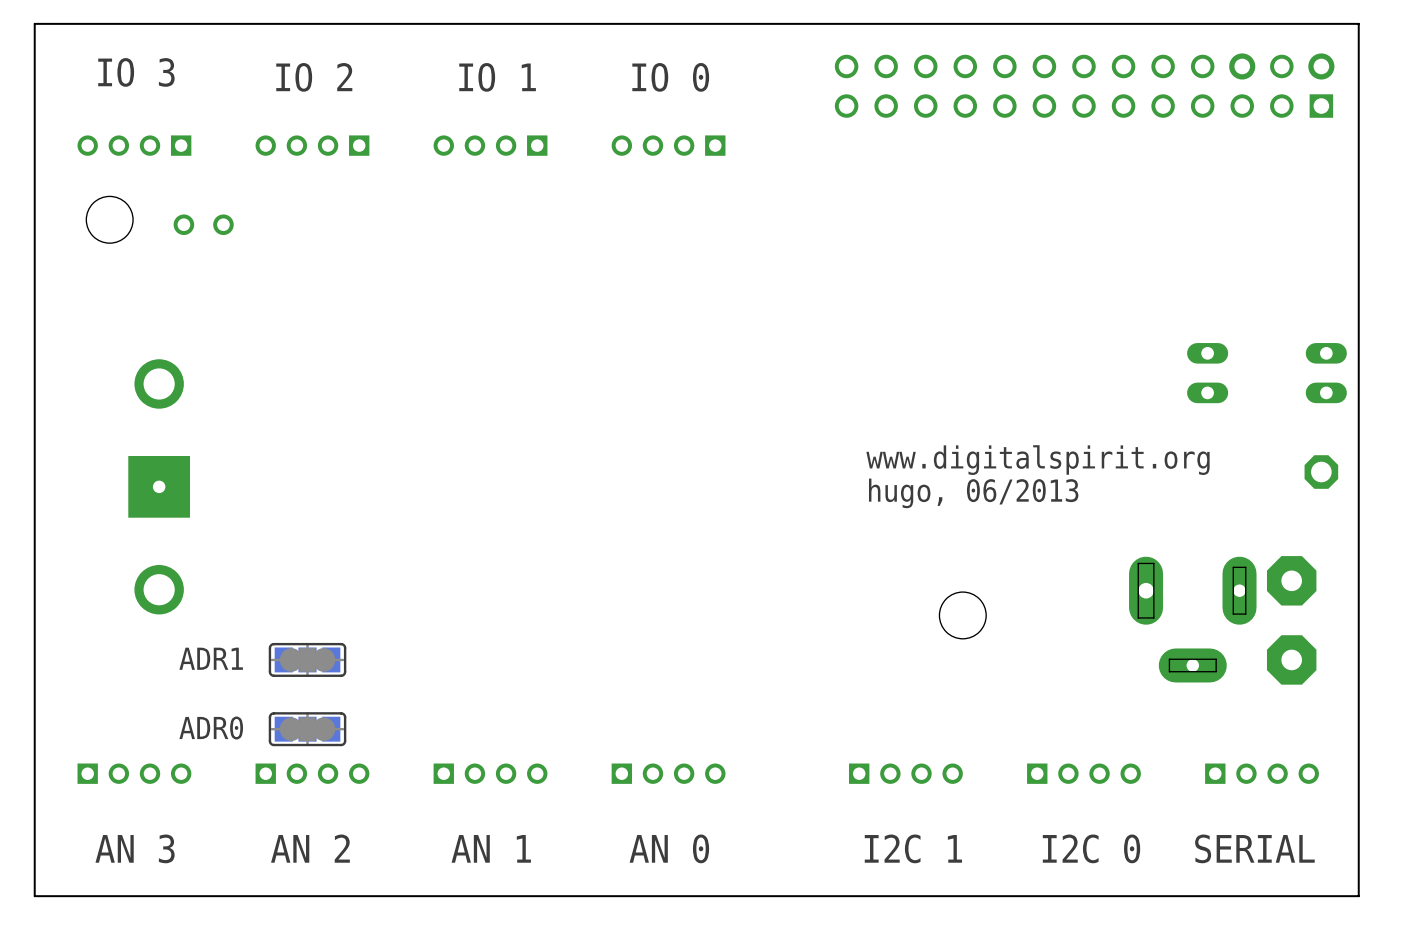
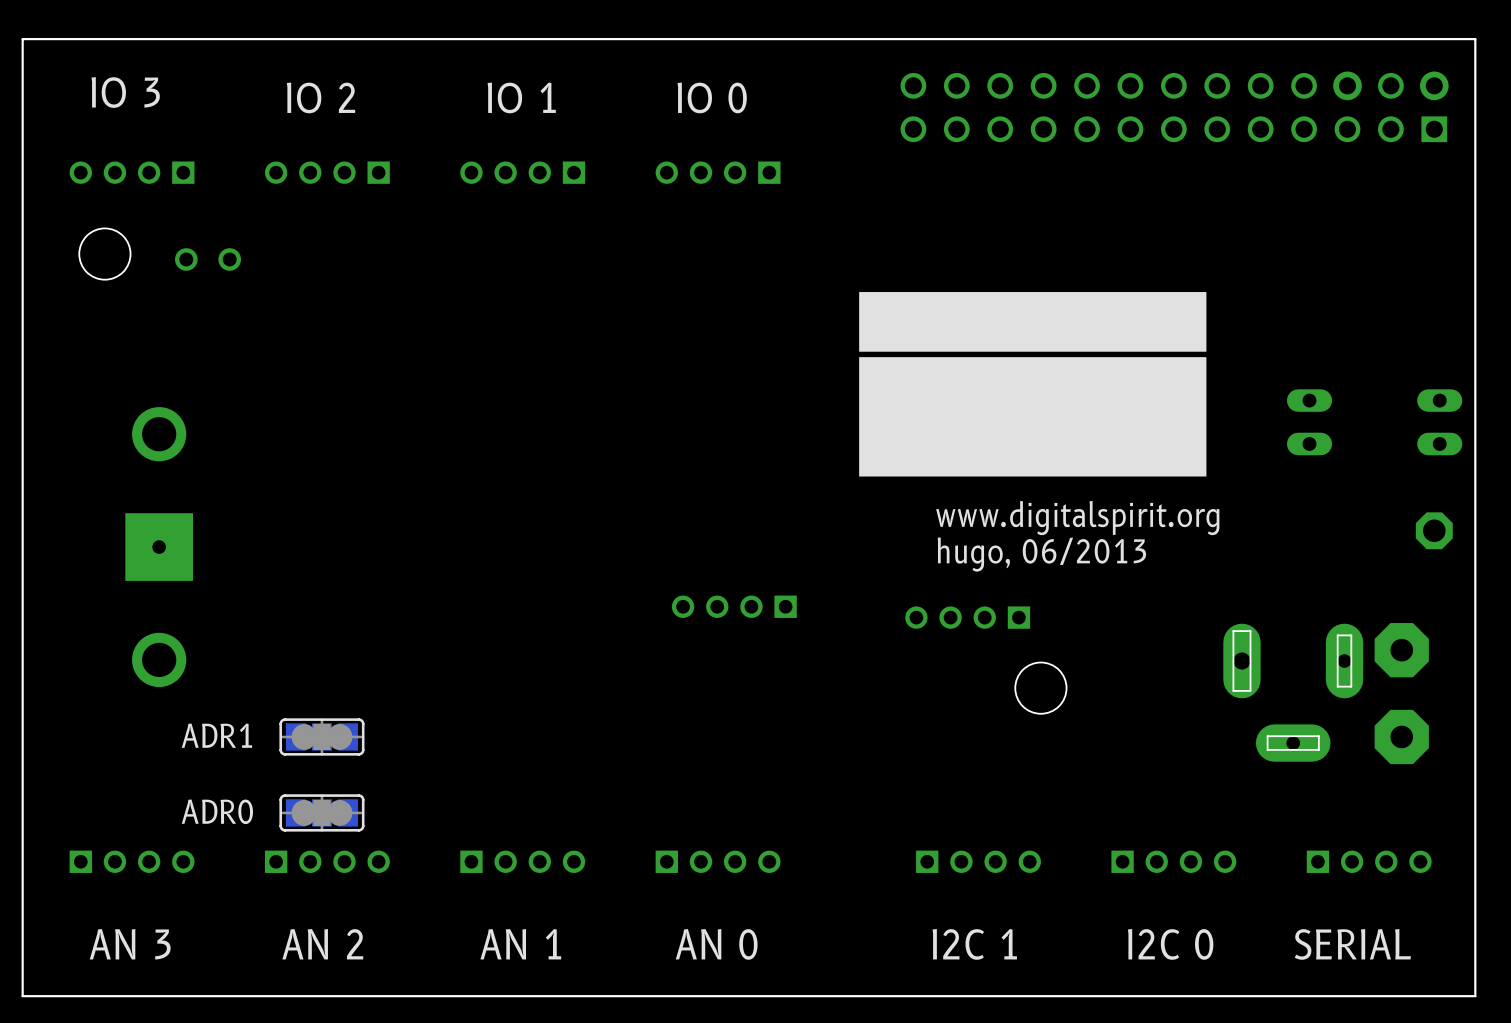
drawing: none -> [859, 292, 1207, 477]
part: none -> (734, 606)
part: none -> (967, 617)

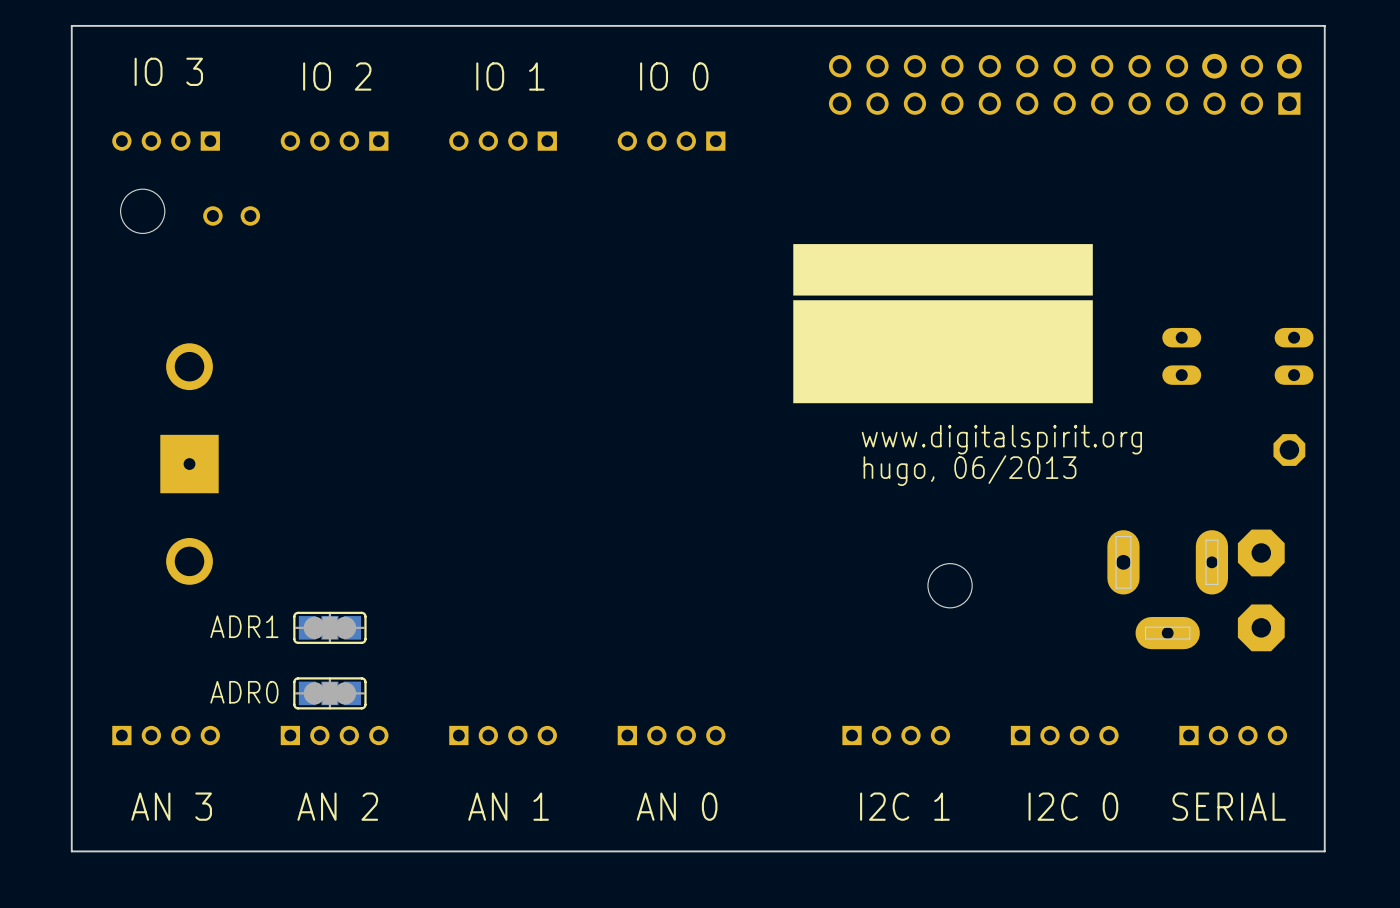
part: (734, 606) -> none
part: (967, 617) -> none

